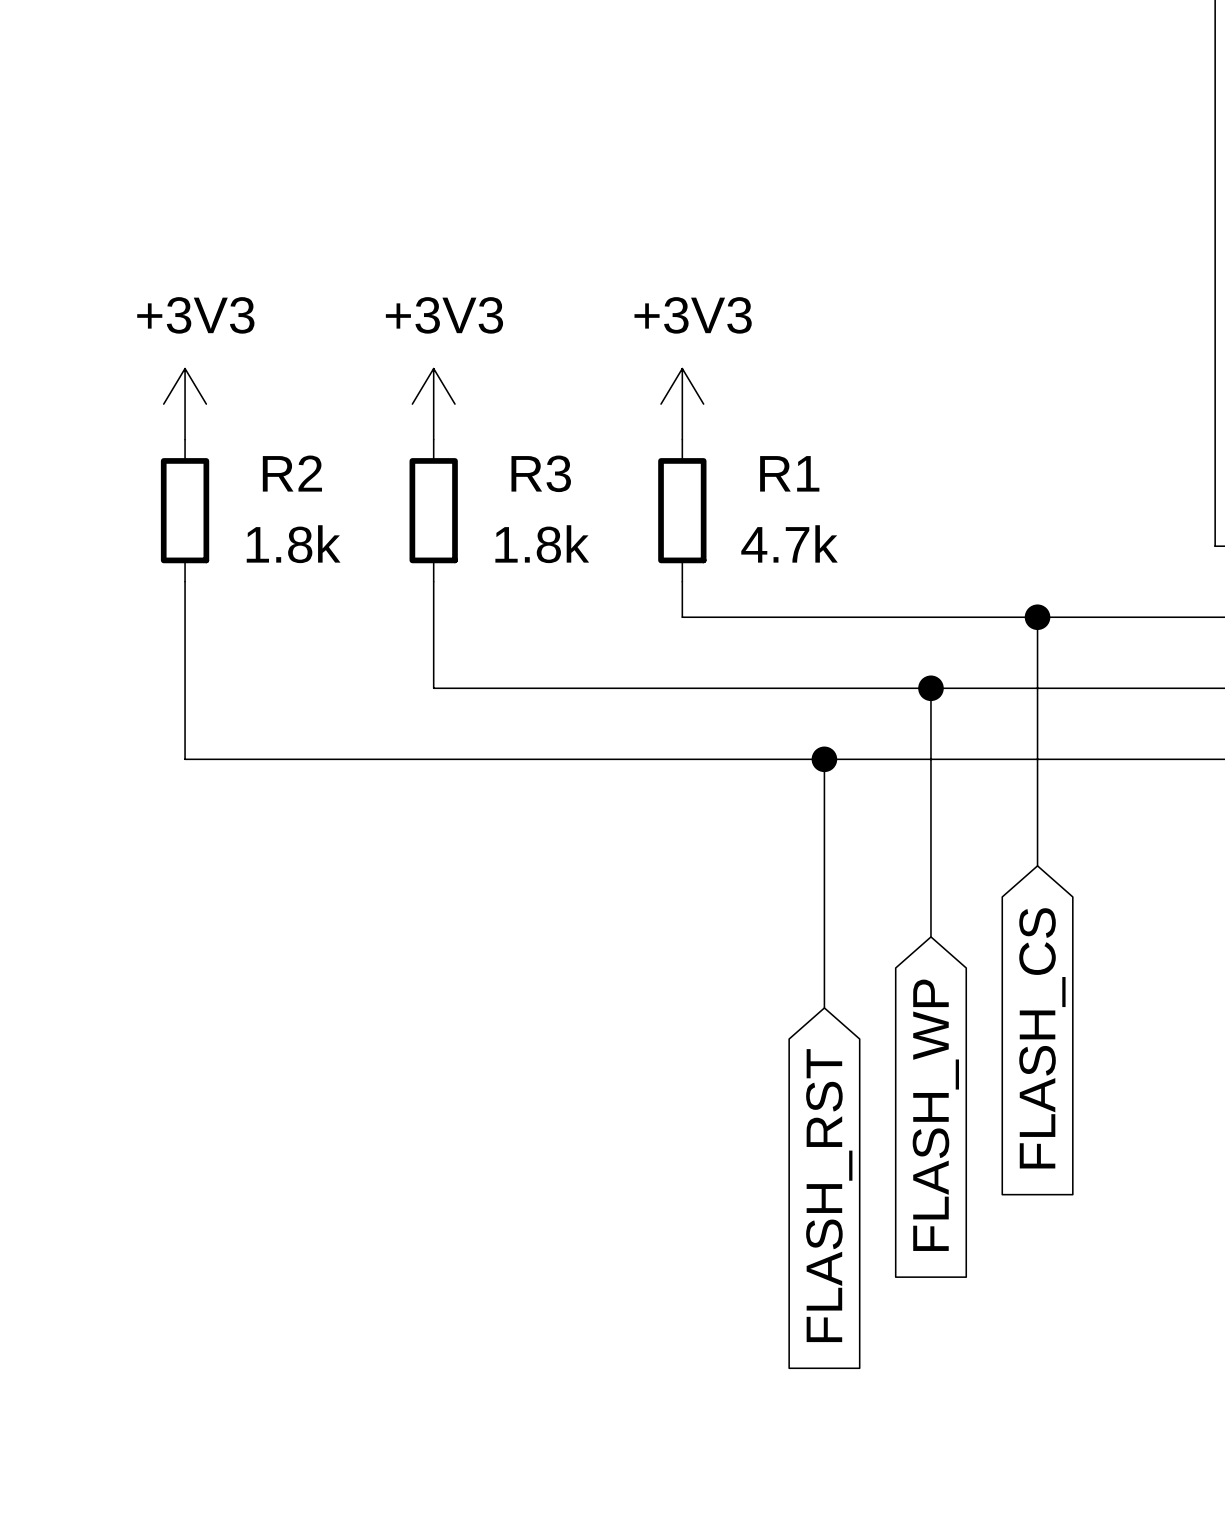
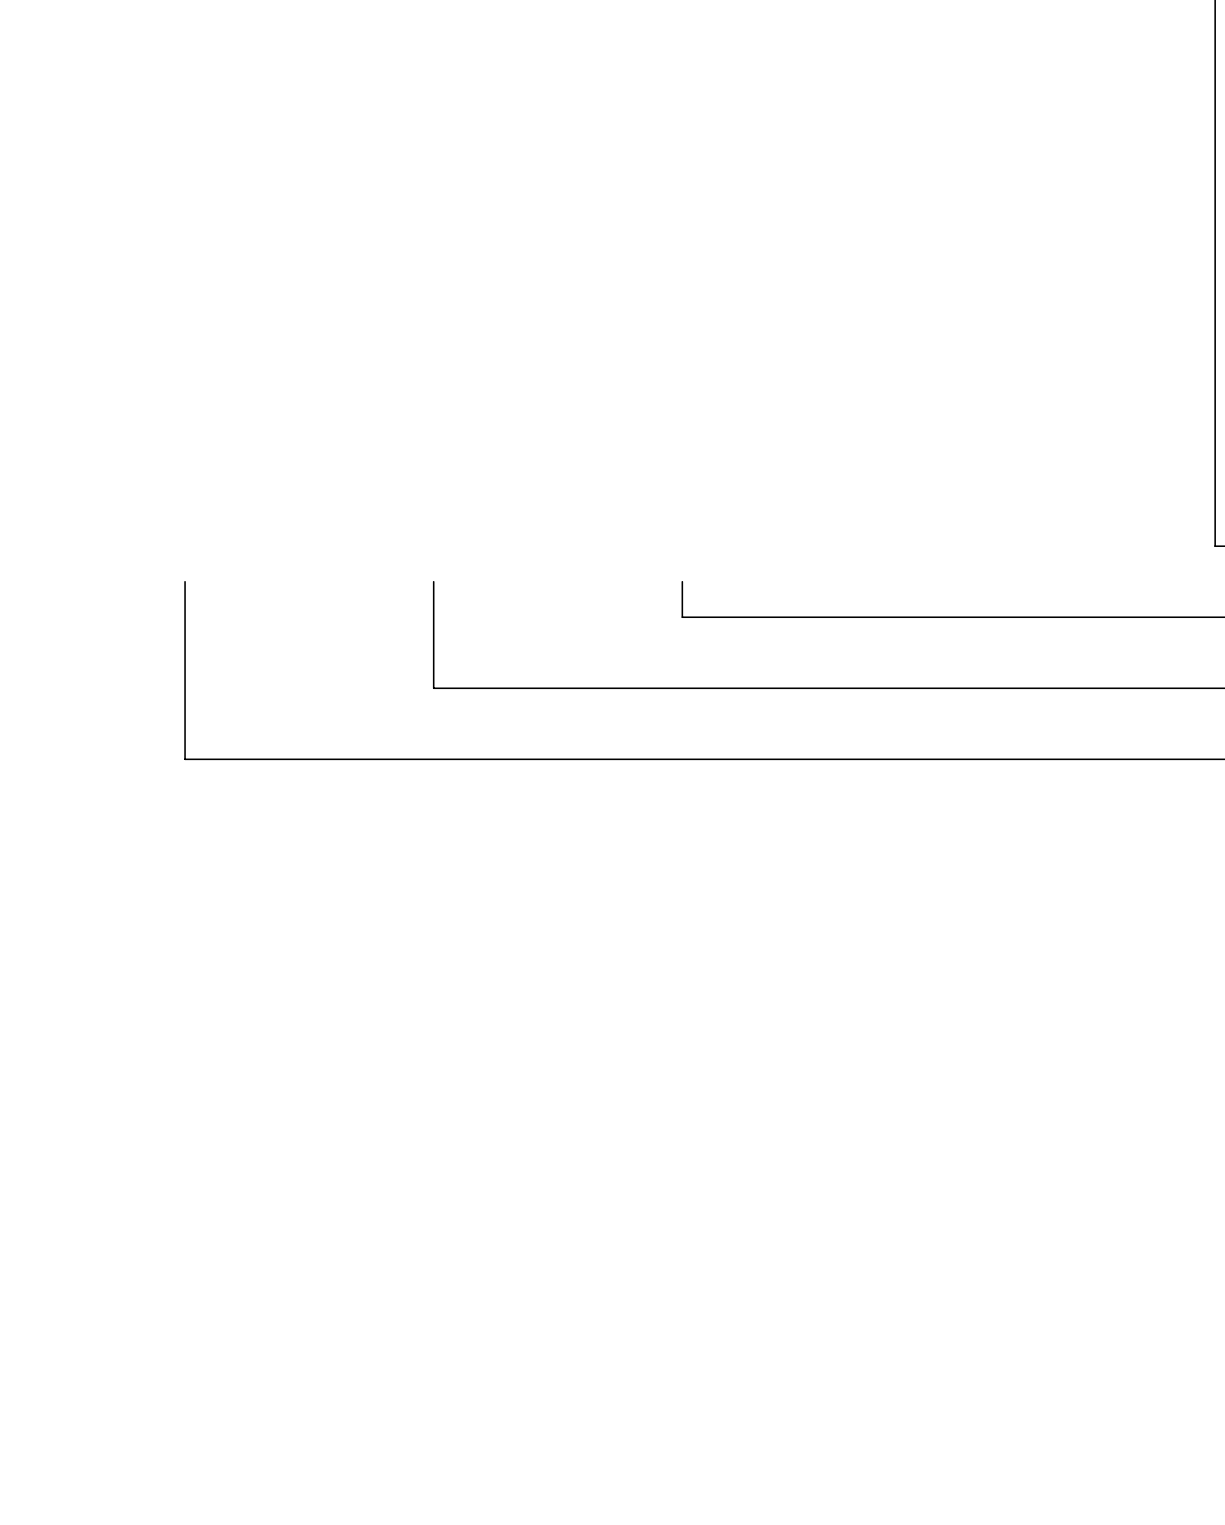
power symbol: +3V3 (185, 404) -> none
power symbol: +3V3 (433, 404) -> none
power symbol: +3V3 (682, 404) -> none
R2: 1.8k (185, 510) -> none
R3: 1.8k (433, 510) -> none
R1: 4.7k (682, 510) -> none
wire: (1037, 617) (1037, 865) -> none
junction: (1037, 617) -> none
wire: (930, 688) (930, 936) -> none
junction: (930, 688) -> none
wire: (824, 759) (824, 1007) -> none
junction: (824, 759) -> none
global label: FLASH_CS (1042, 1038) -> none
global label: FLASH_WP (935, 1115) -> none
global label: FLASH_RST (829, 1195) -> none

